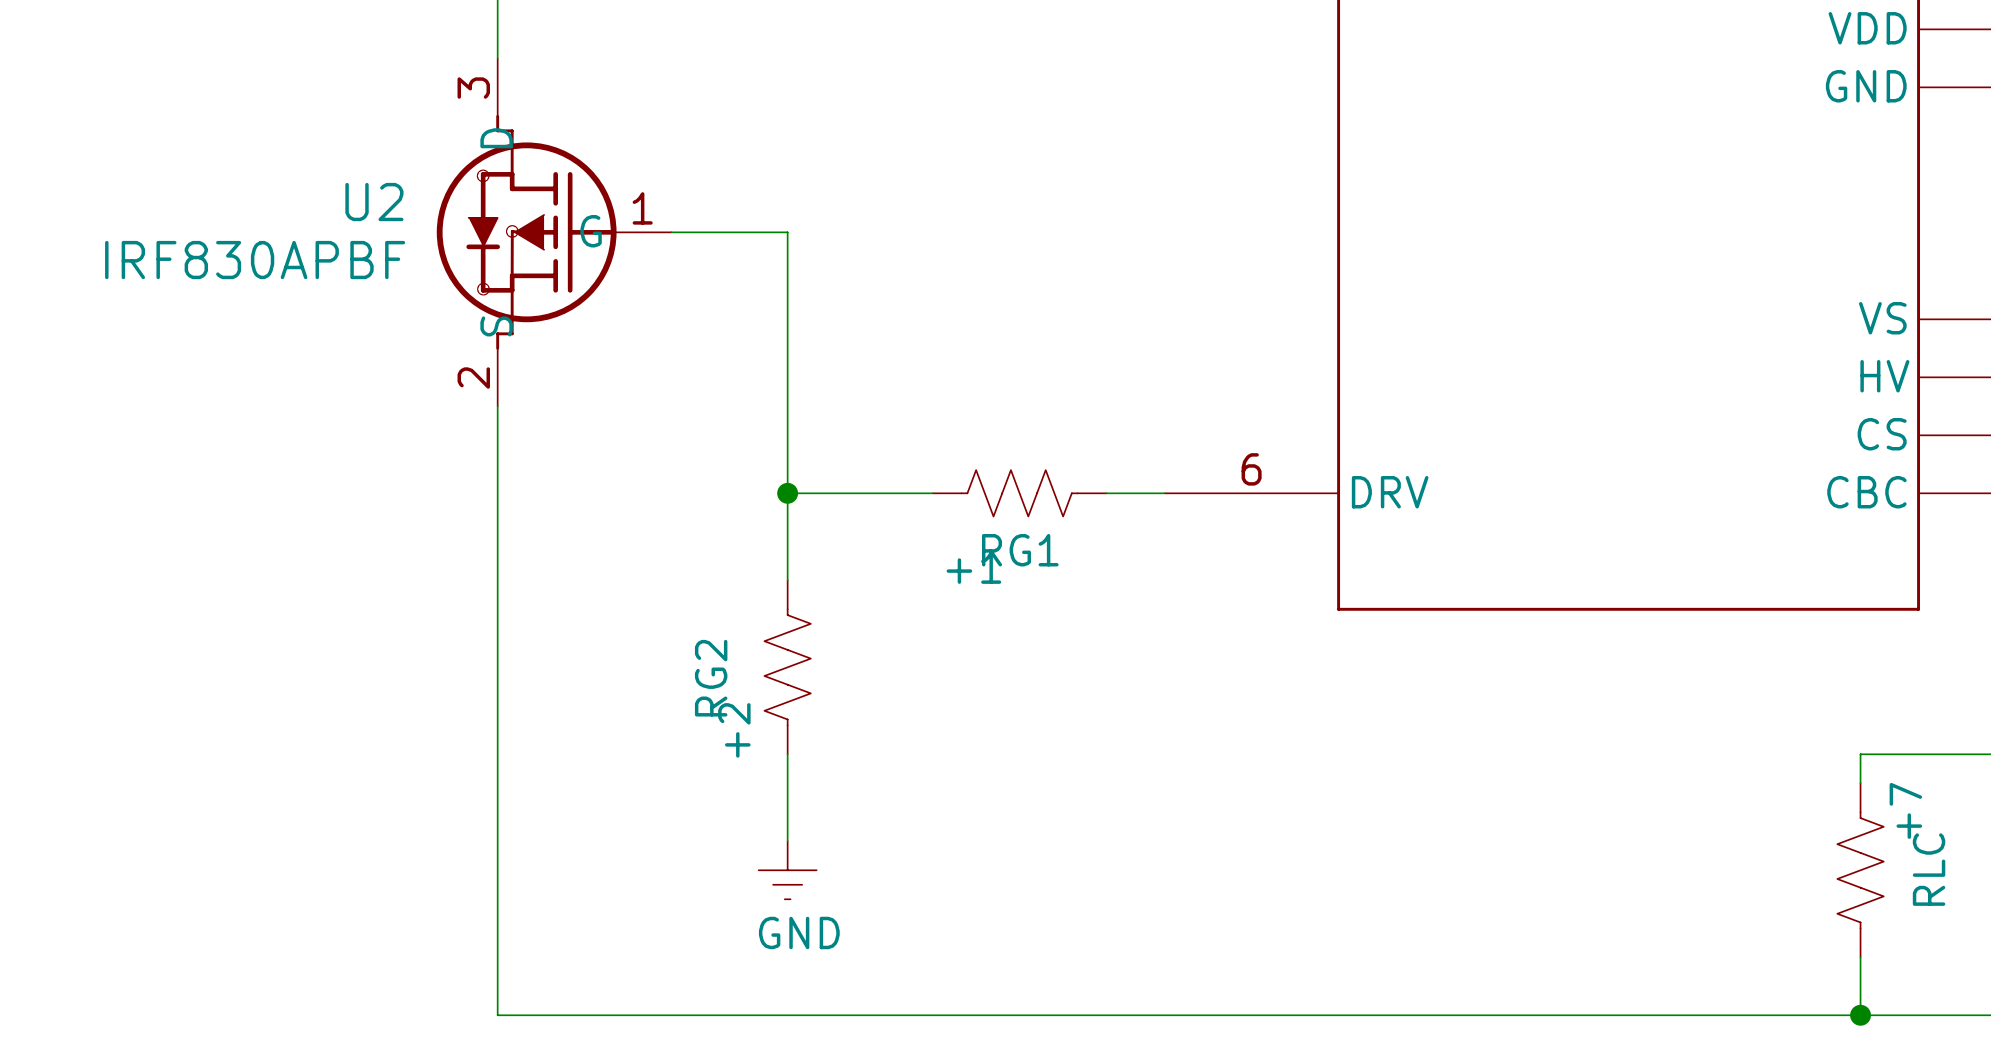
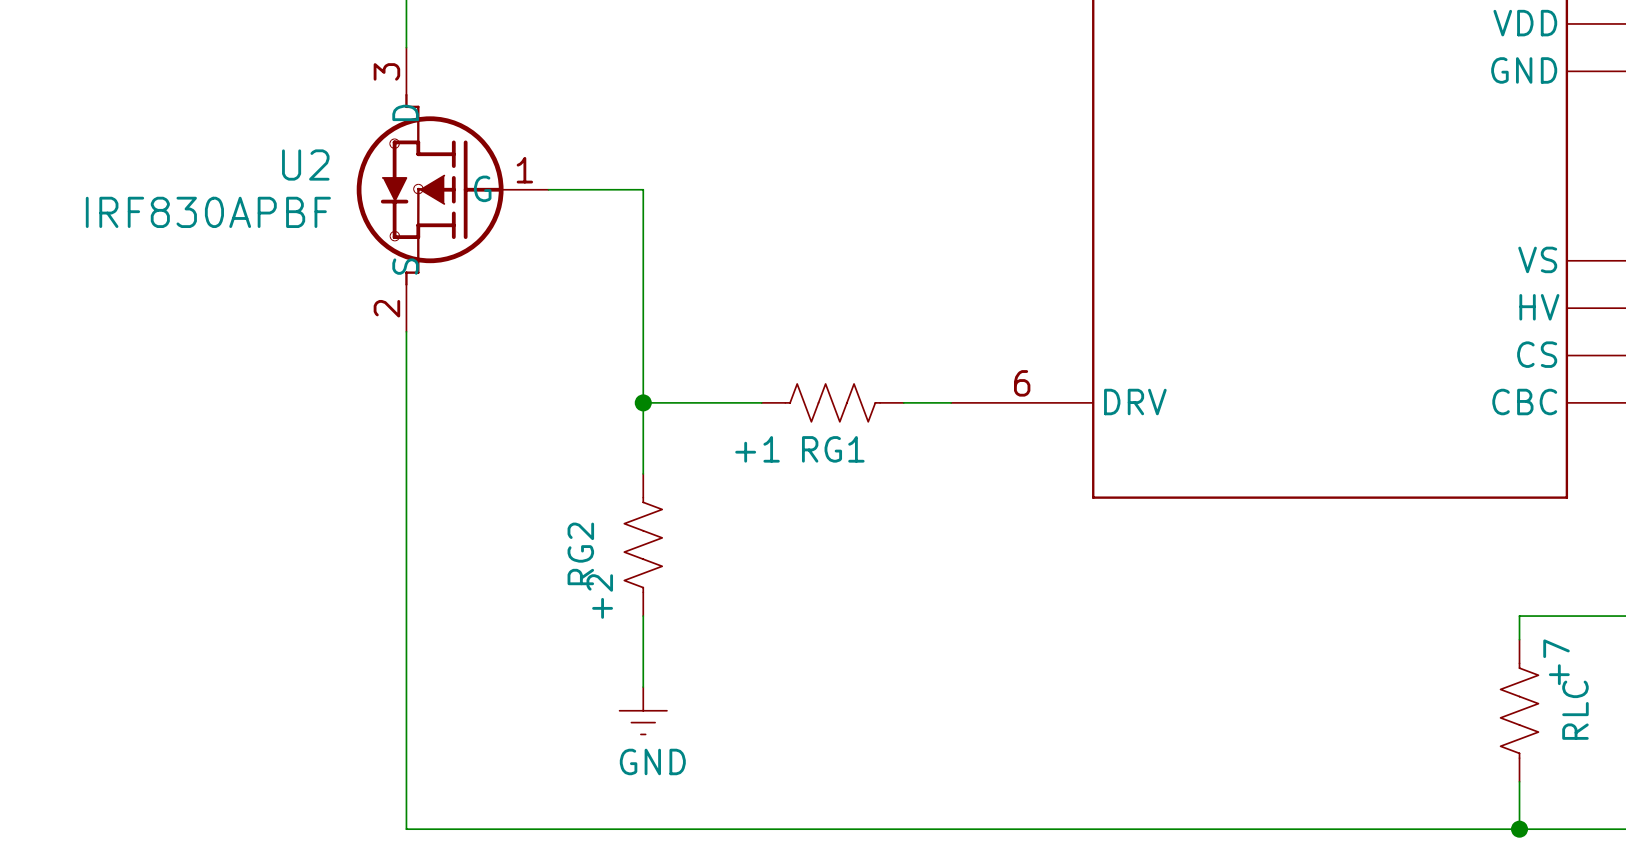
+1 name position: +1 (973, 567) -> +1 (757, 449)

